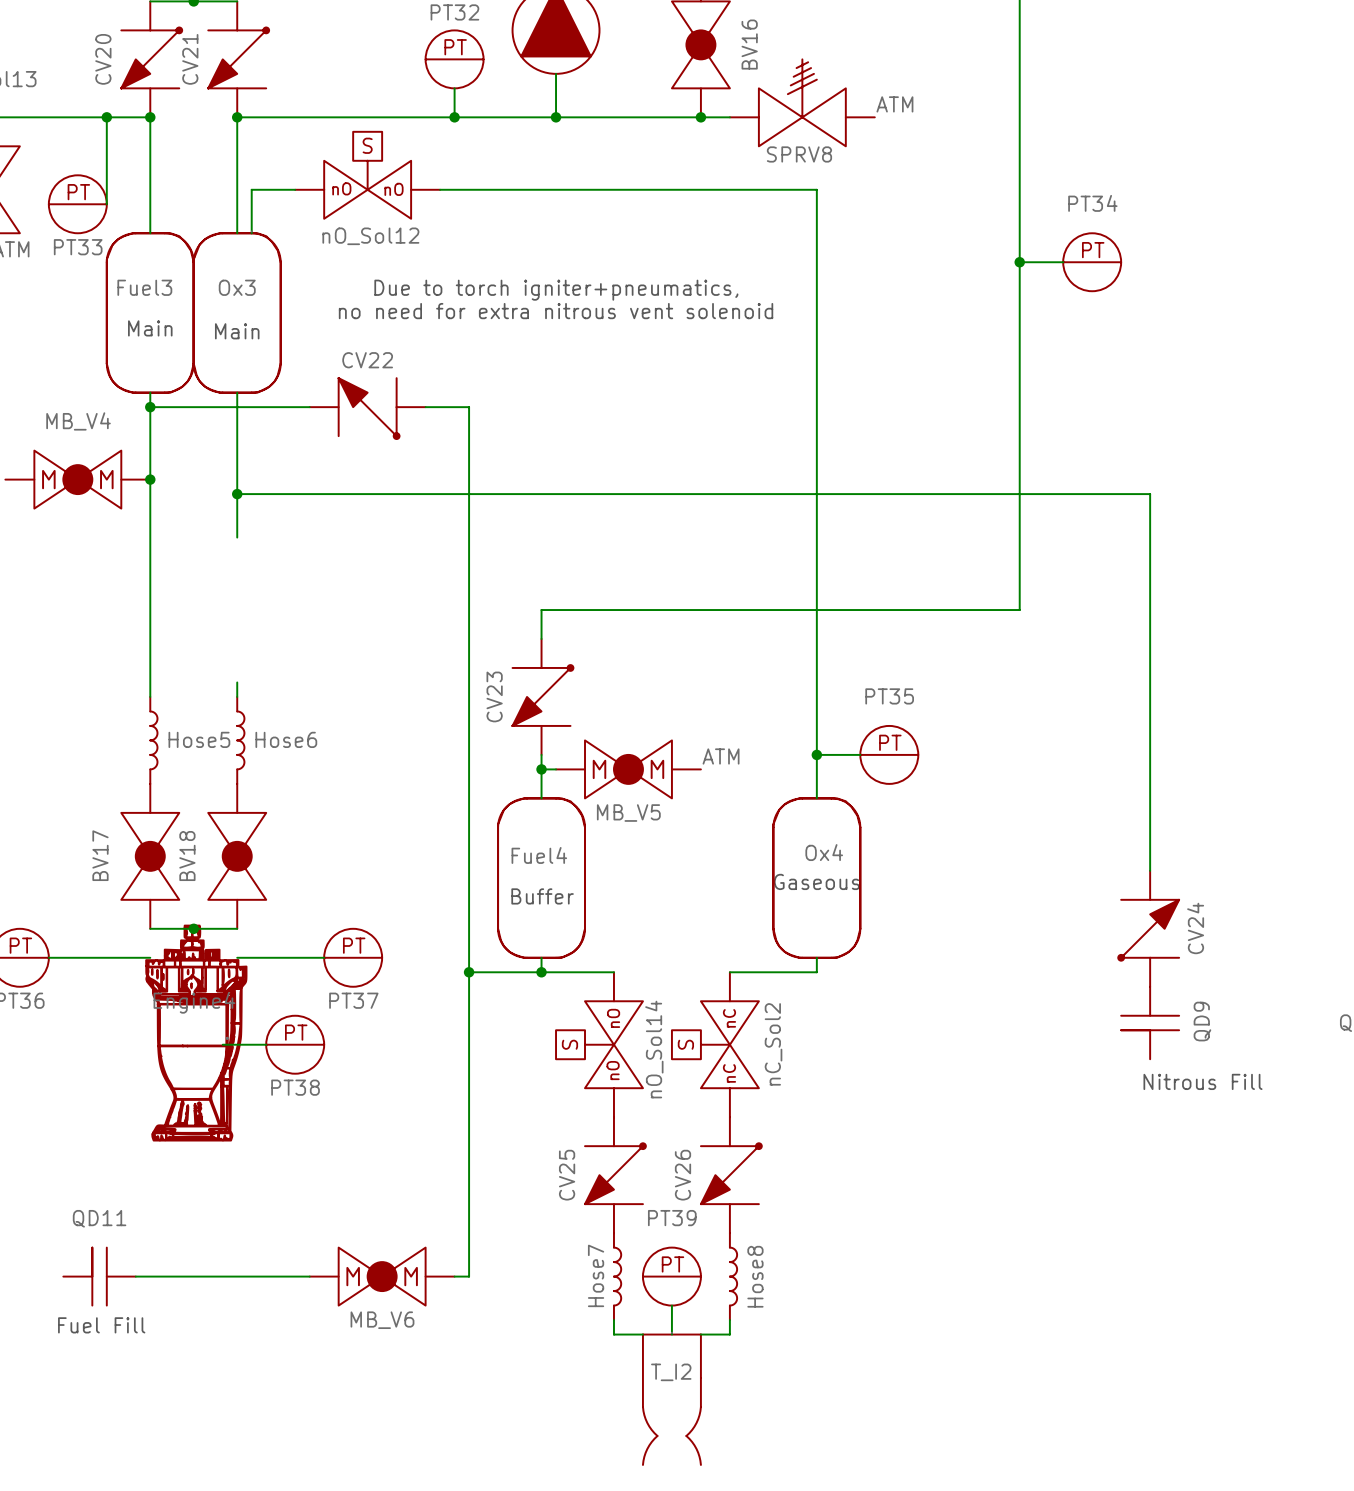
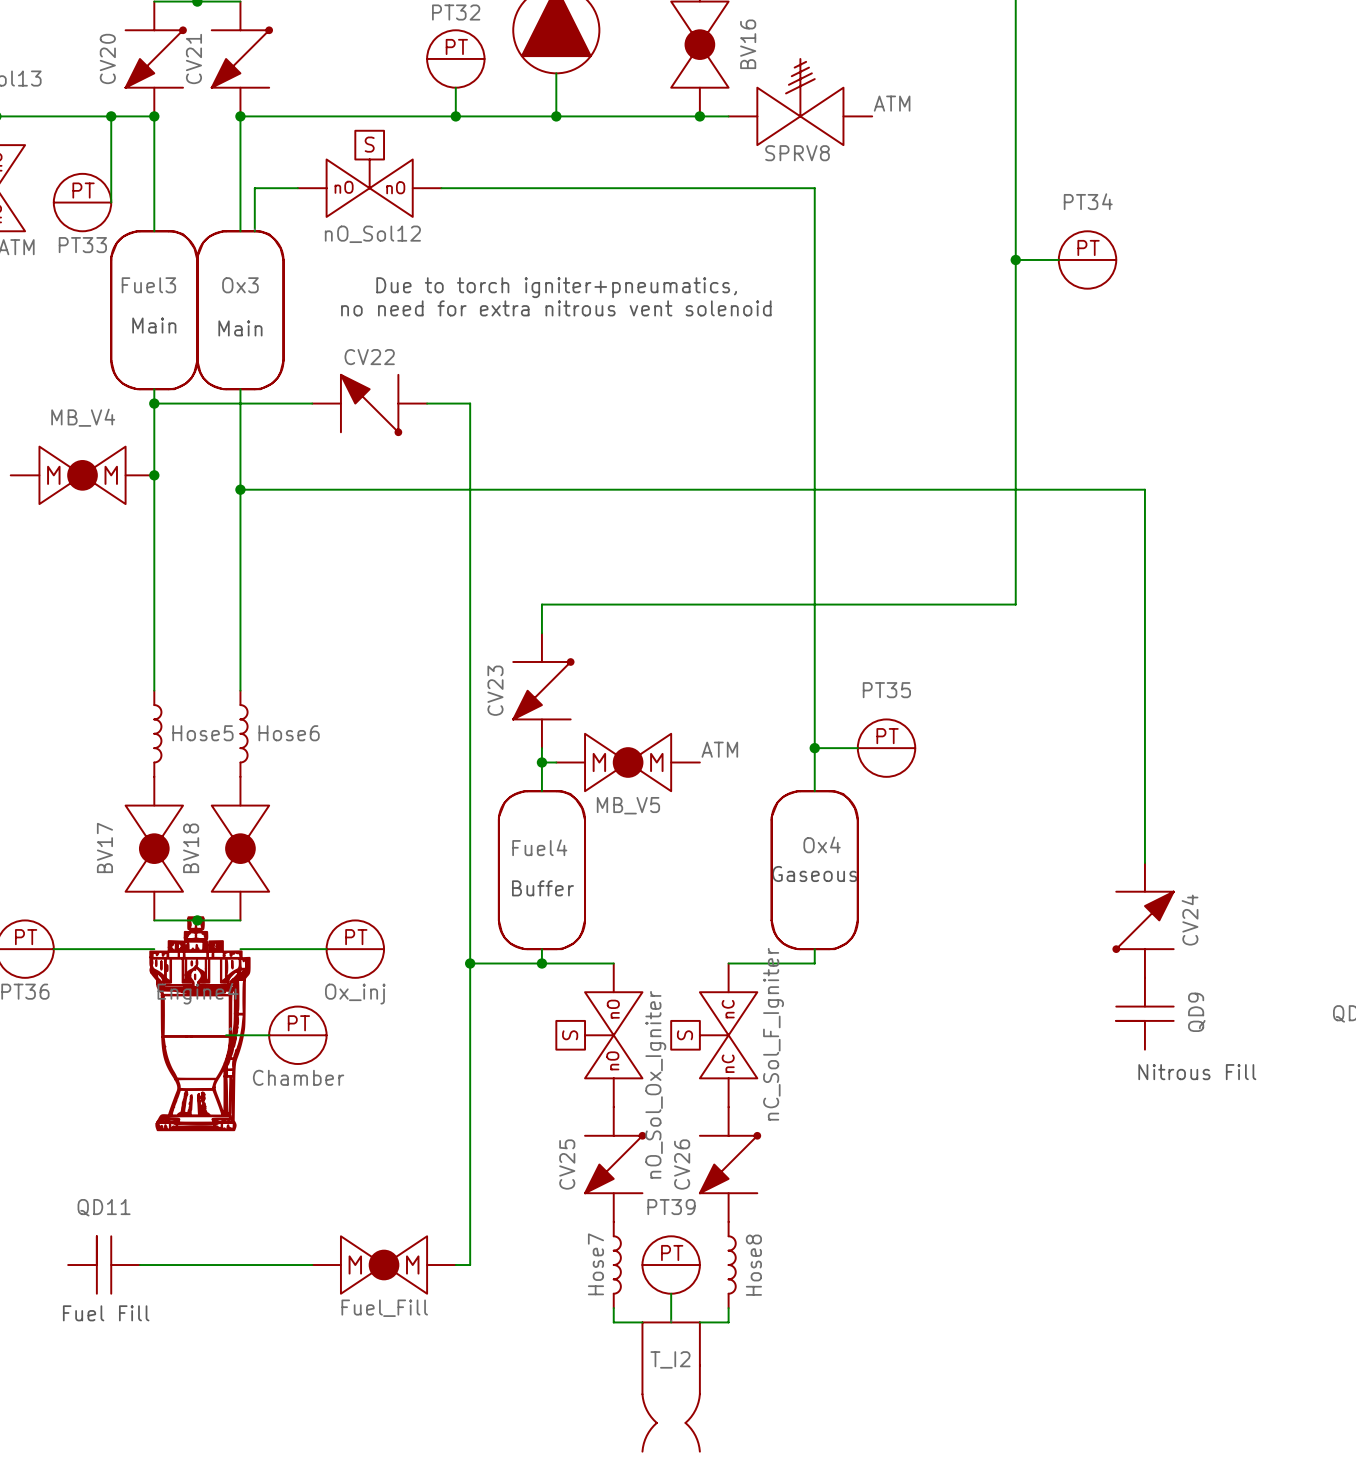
wire: none -> (240, 532) (240, 676)
PT37 name: PT37 (353, 1000) -> Ox_inj (355, 994)
nC_Sol2 name: nC_Sol2 (773, 1044) -> nC_Sol_F_Igniter (773, 1034)
nO_Sol14 name: nO_Sol14 (654, 1049) -> nO_Sol_Ox_Igniter (655, 1084)
PT38 name: PT38 (295, 1087) -> Chamber (298, 1077)
MB_V6 name: MB_V6 (382, 1320) -> Fuel_Fill (384, 1308)

